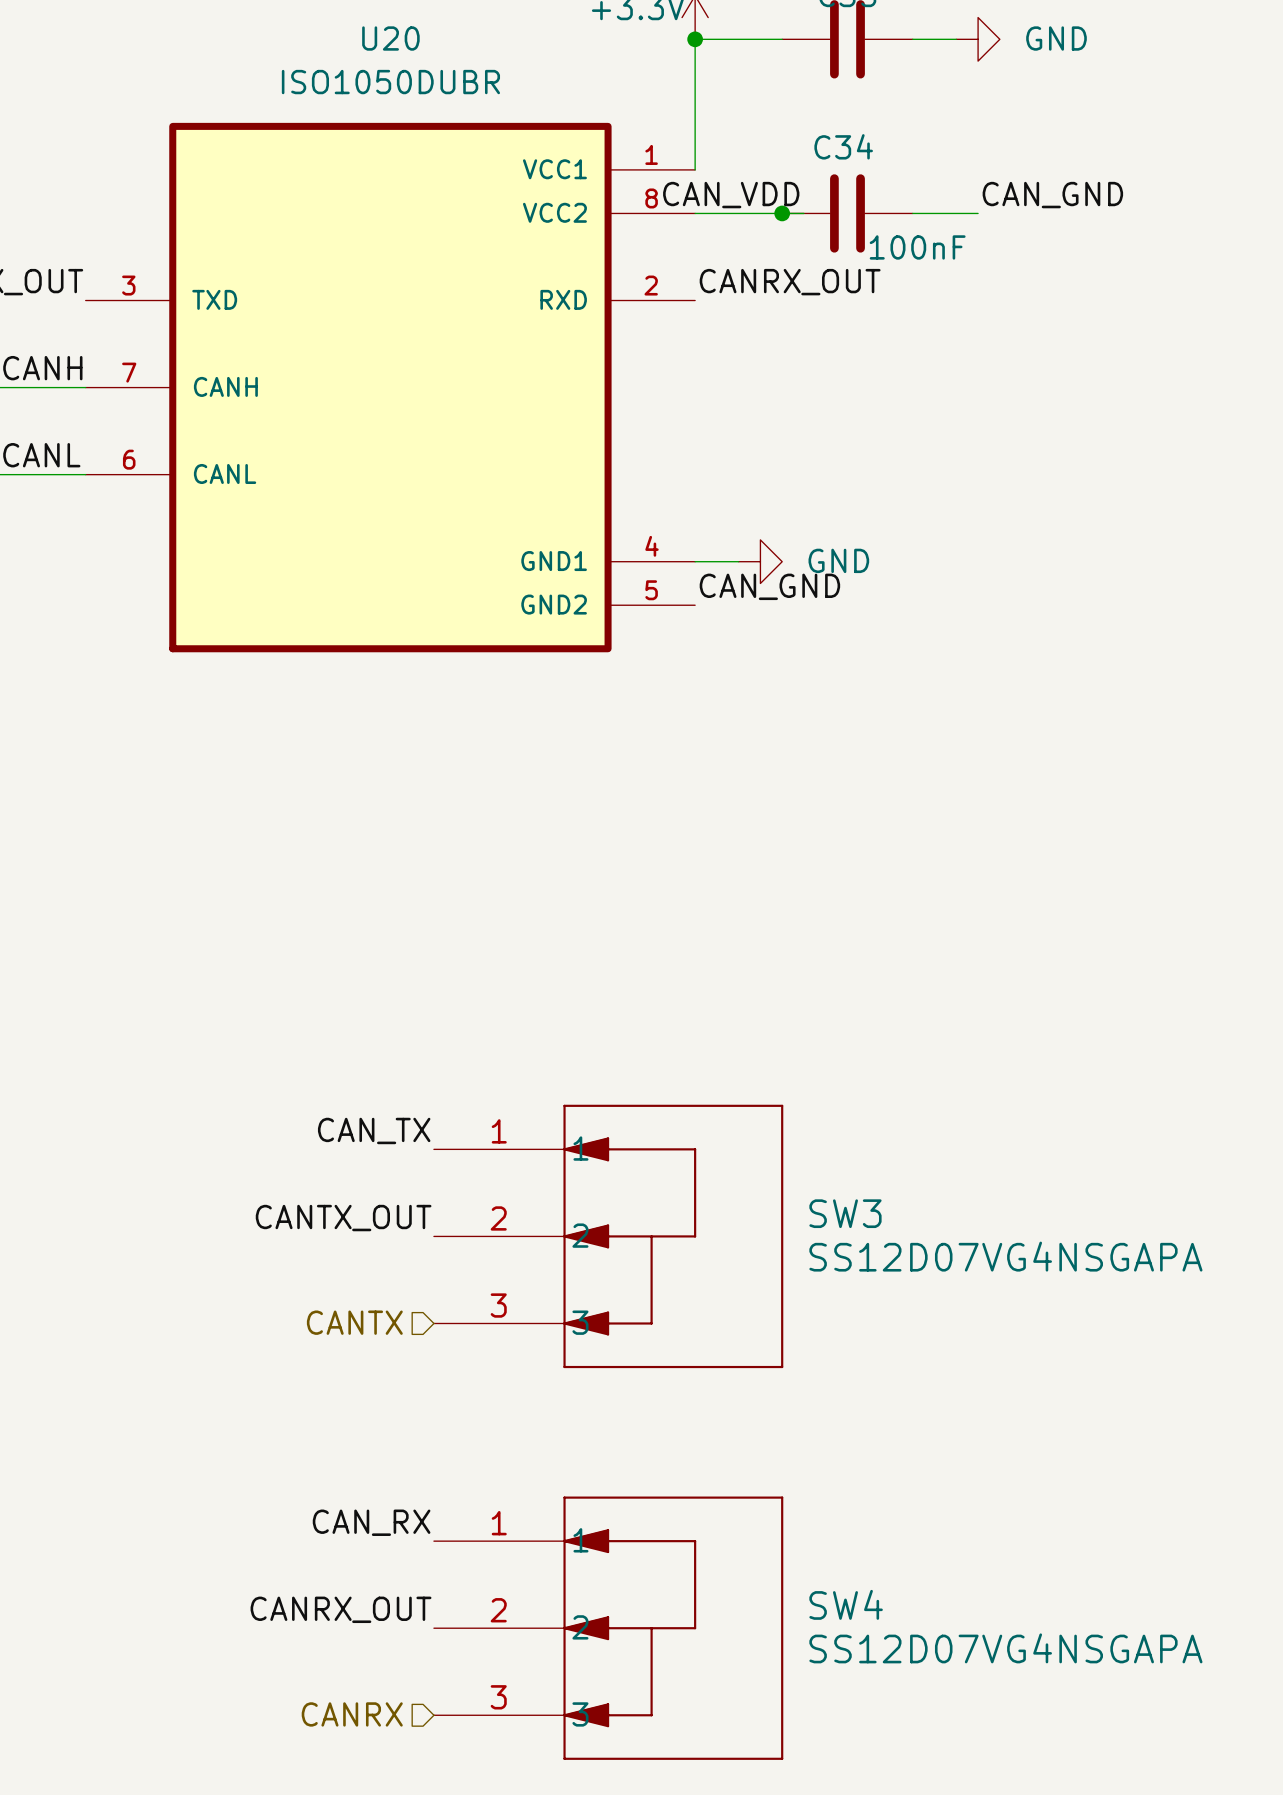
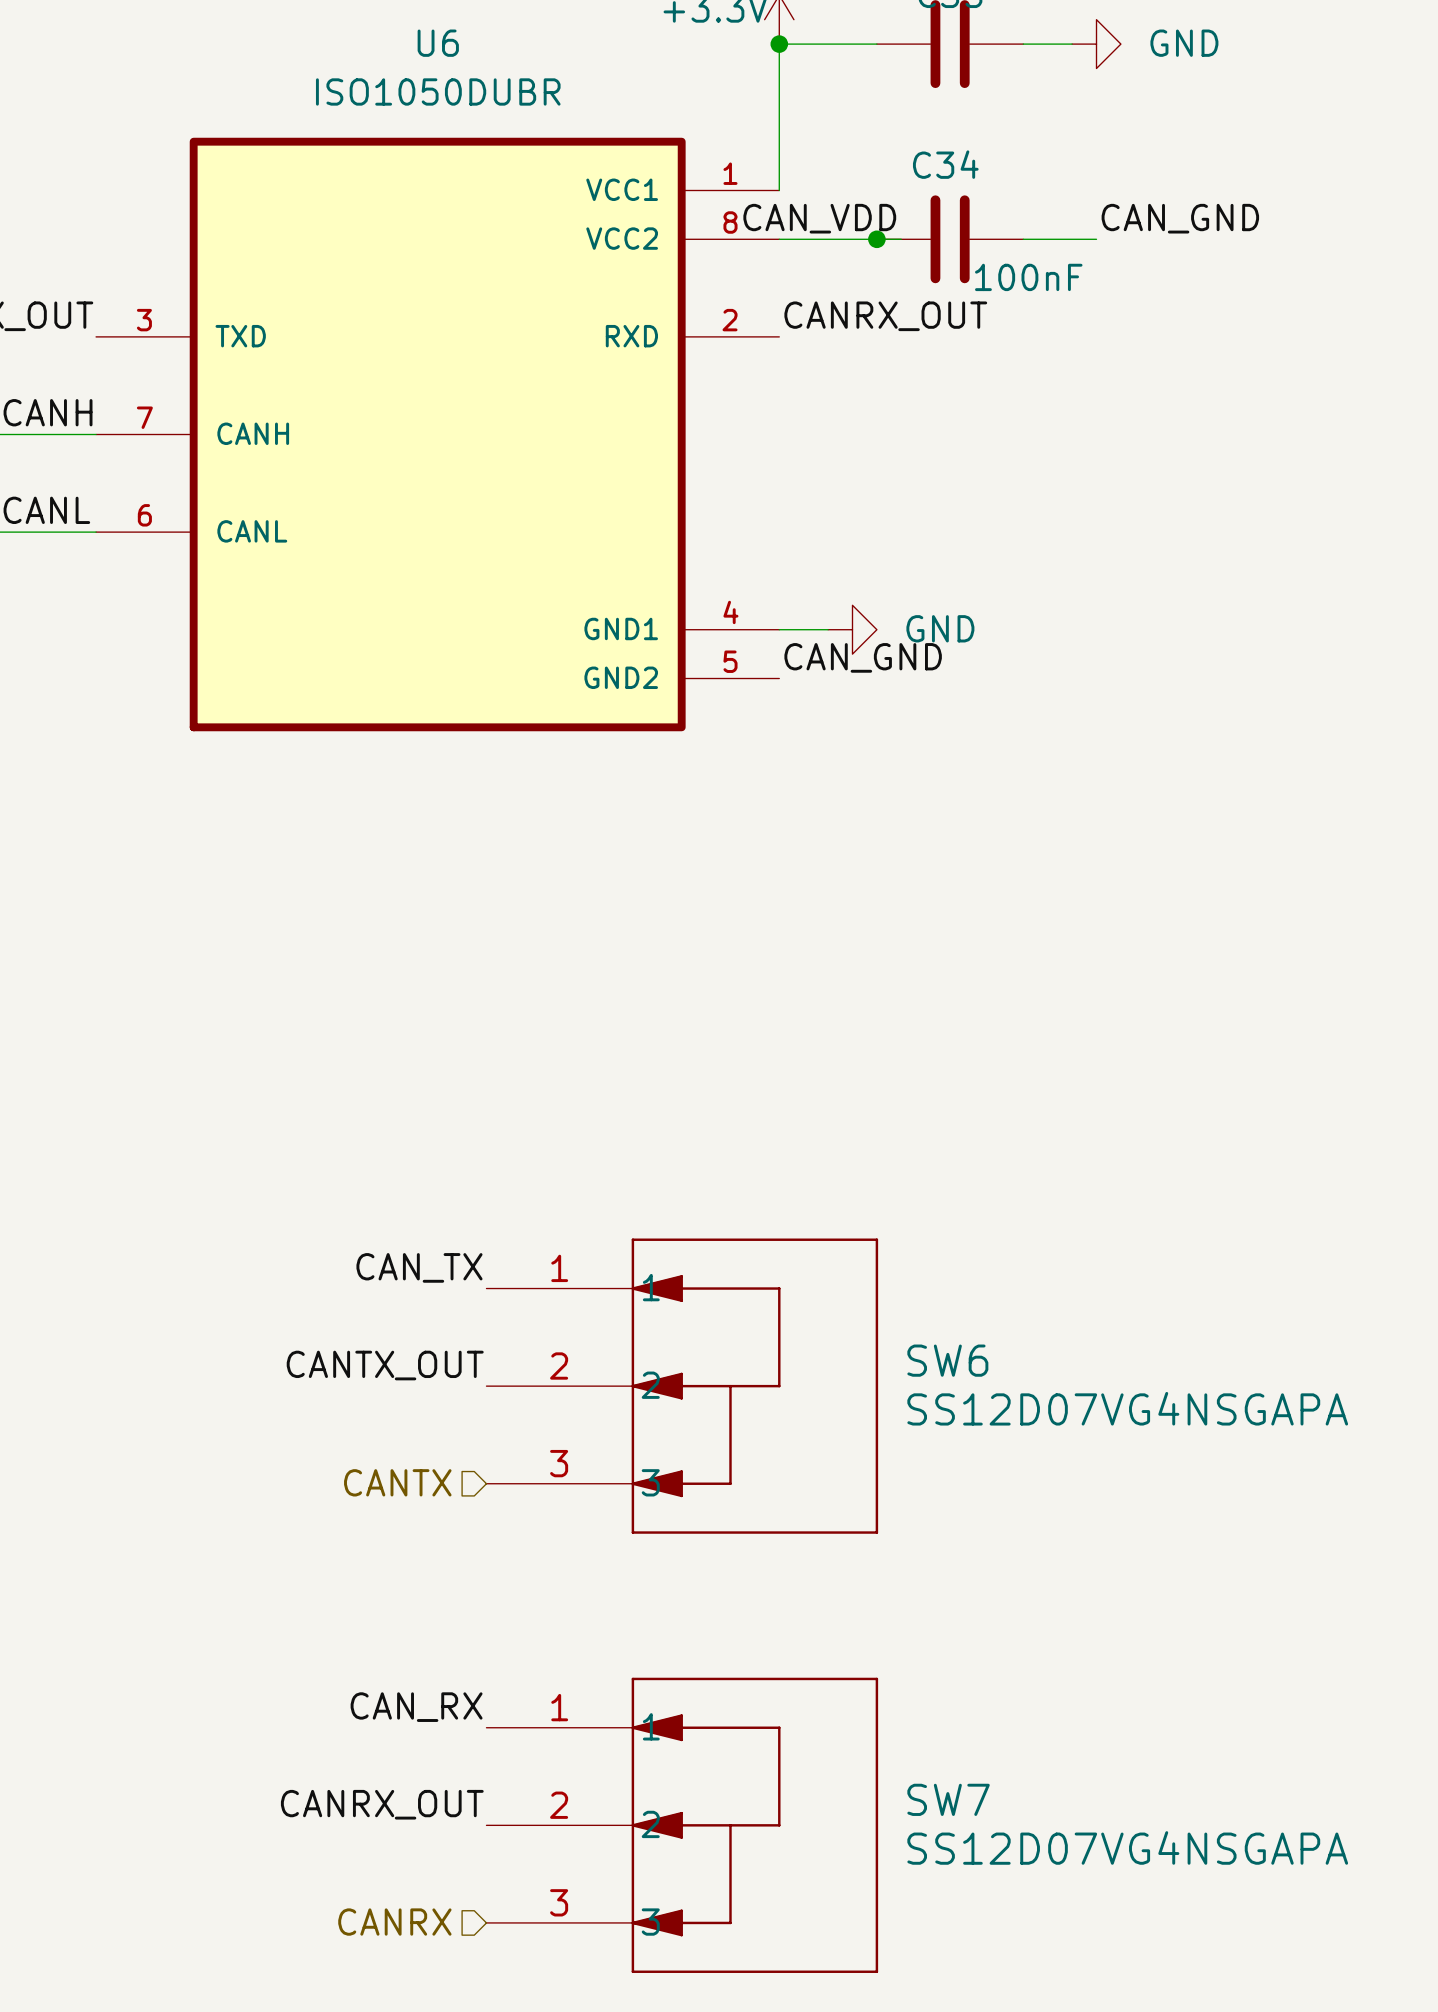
U20 name: U20 (390, 38) -> U6 (438, 43)
SW3 name: SW3 (845, 1213) -> SW6 (947, 1360)
SW4 name: SW4 (846, 1604) -> SW7 (948, 1799)

